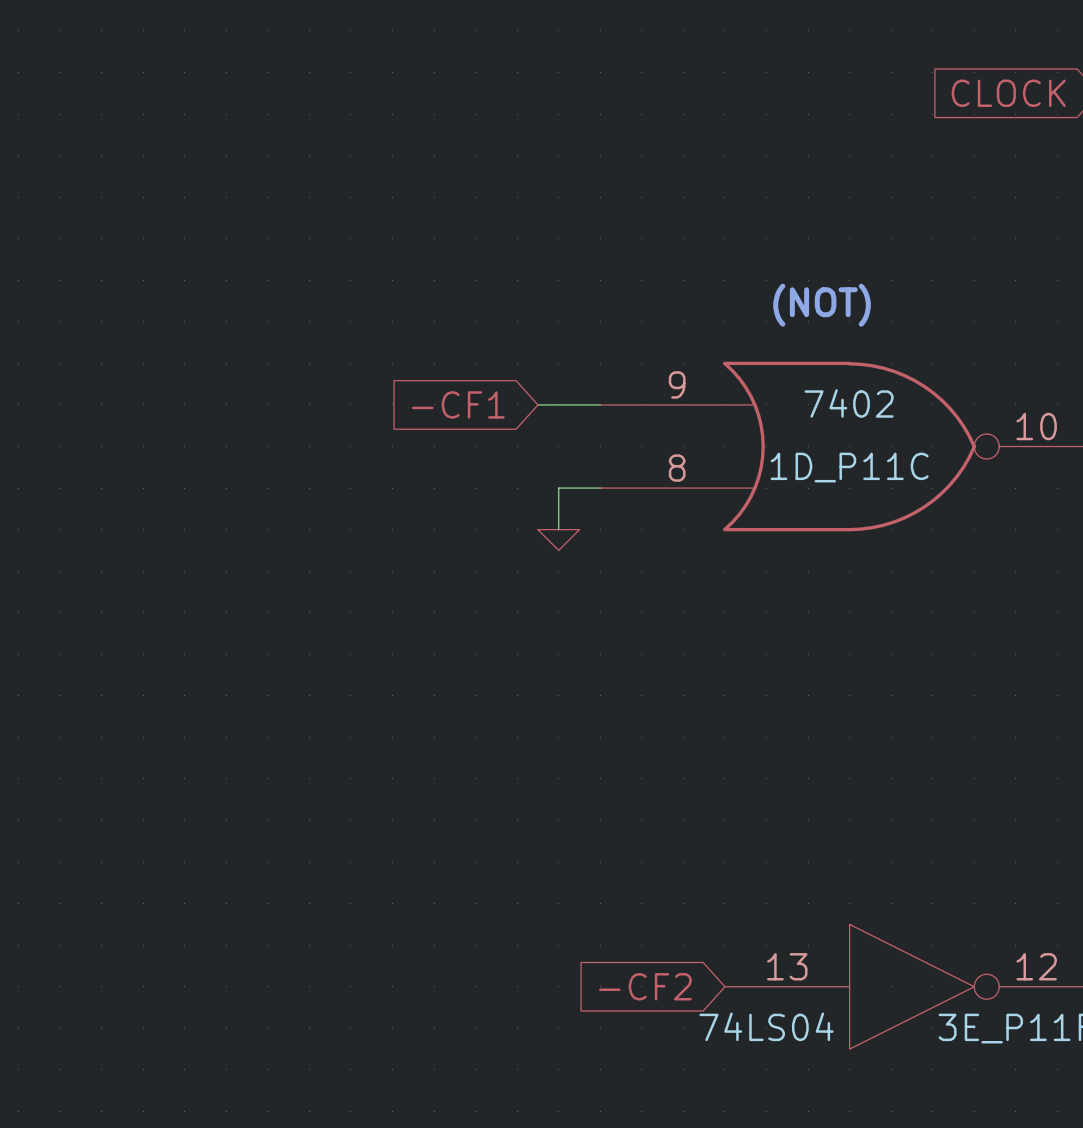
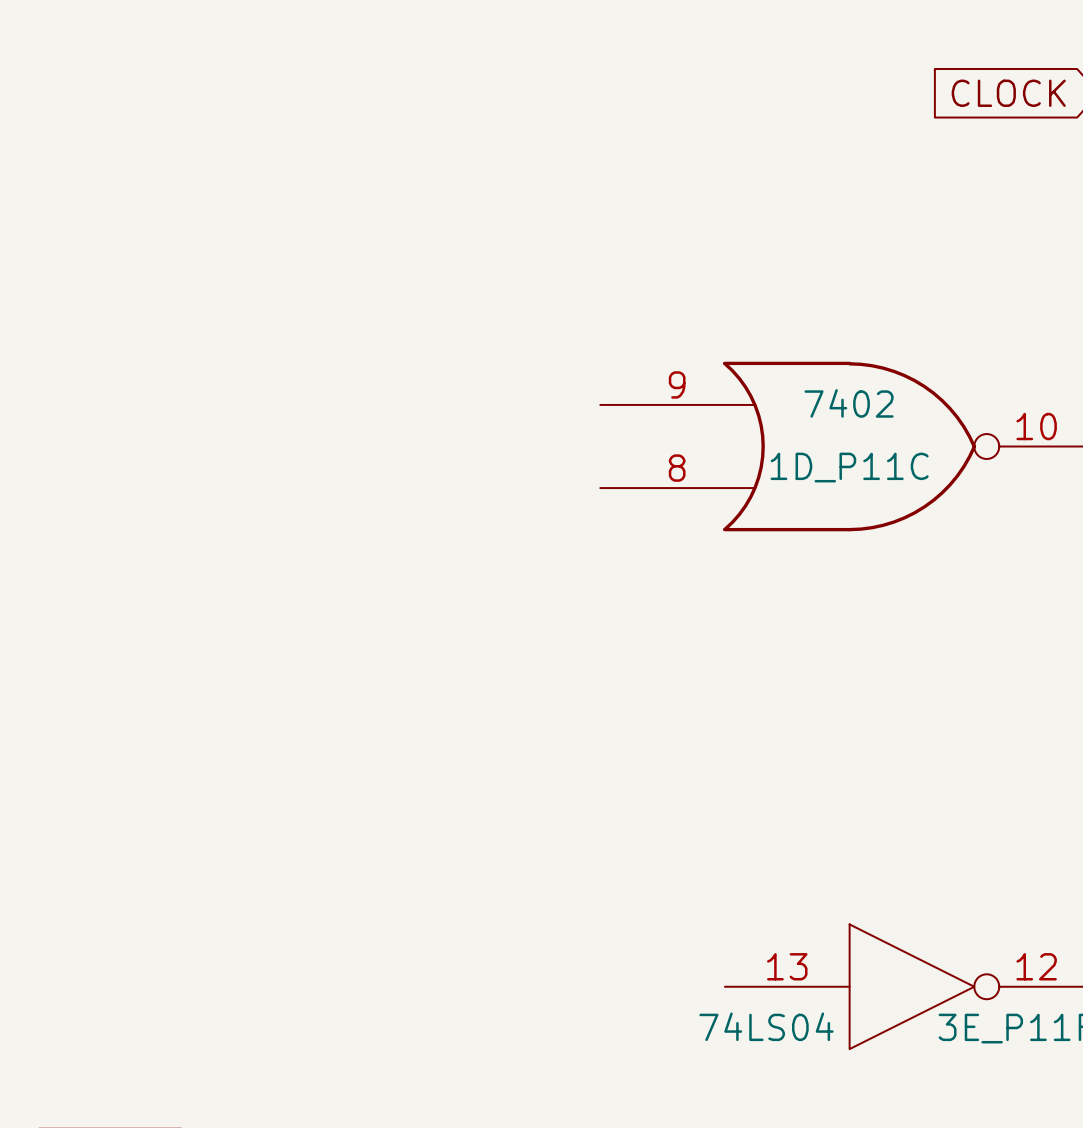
text: (NOT) (822, 305) -> none
global label: -CF1 (458, 404) -> none
wire: (537, 404) (600, 404) -> none
wire: (600, 488) (558, 488) (558, 529) -> none
power symbol: (558, 540) -> none
global label: -CF2 (645, 986) -> none

